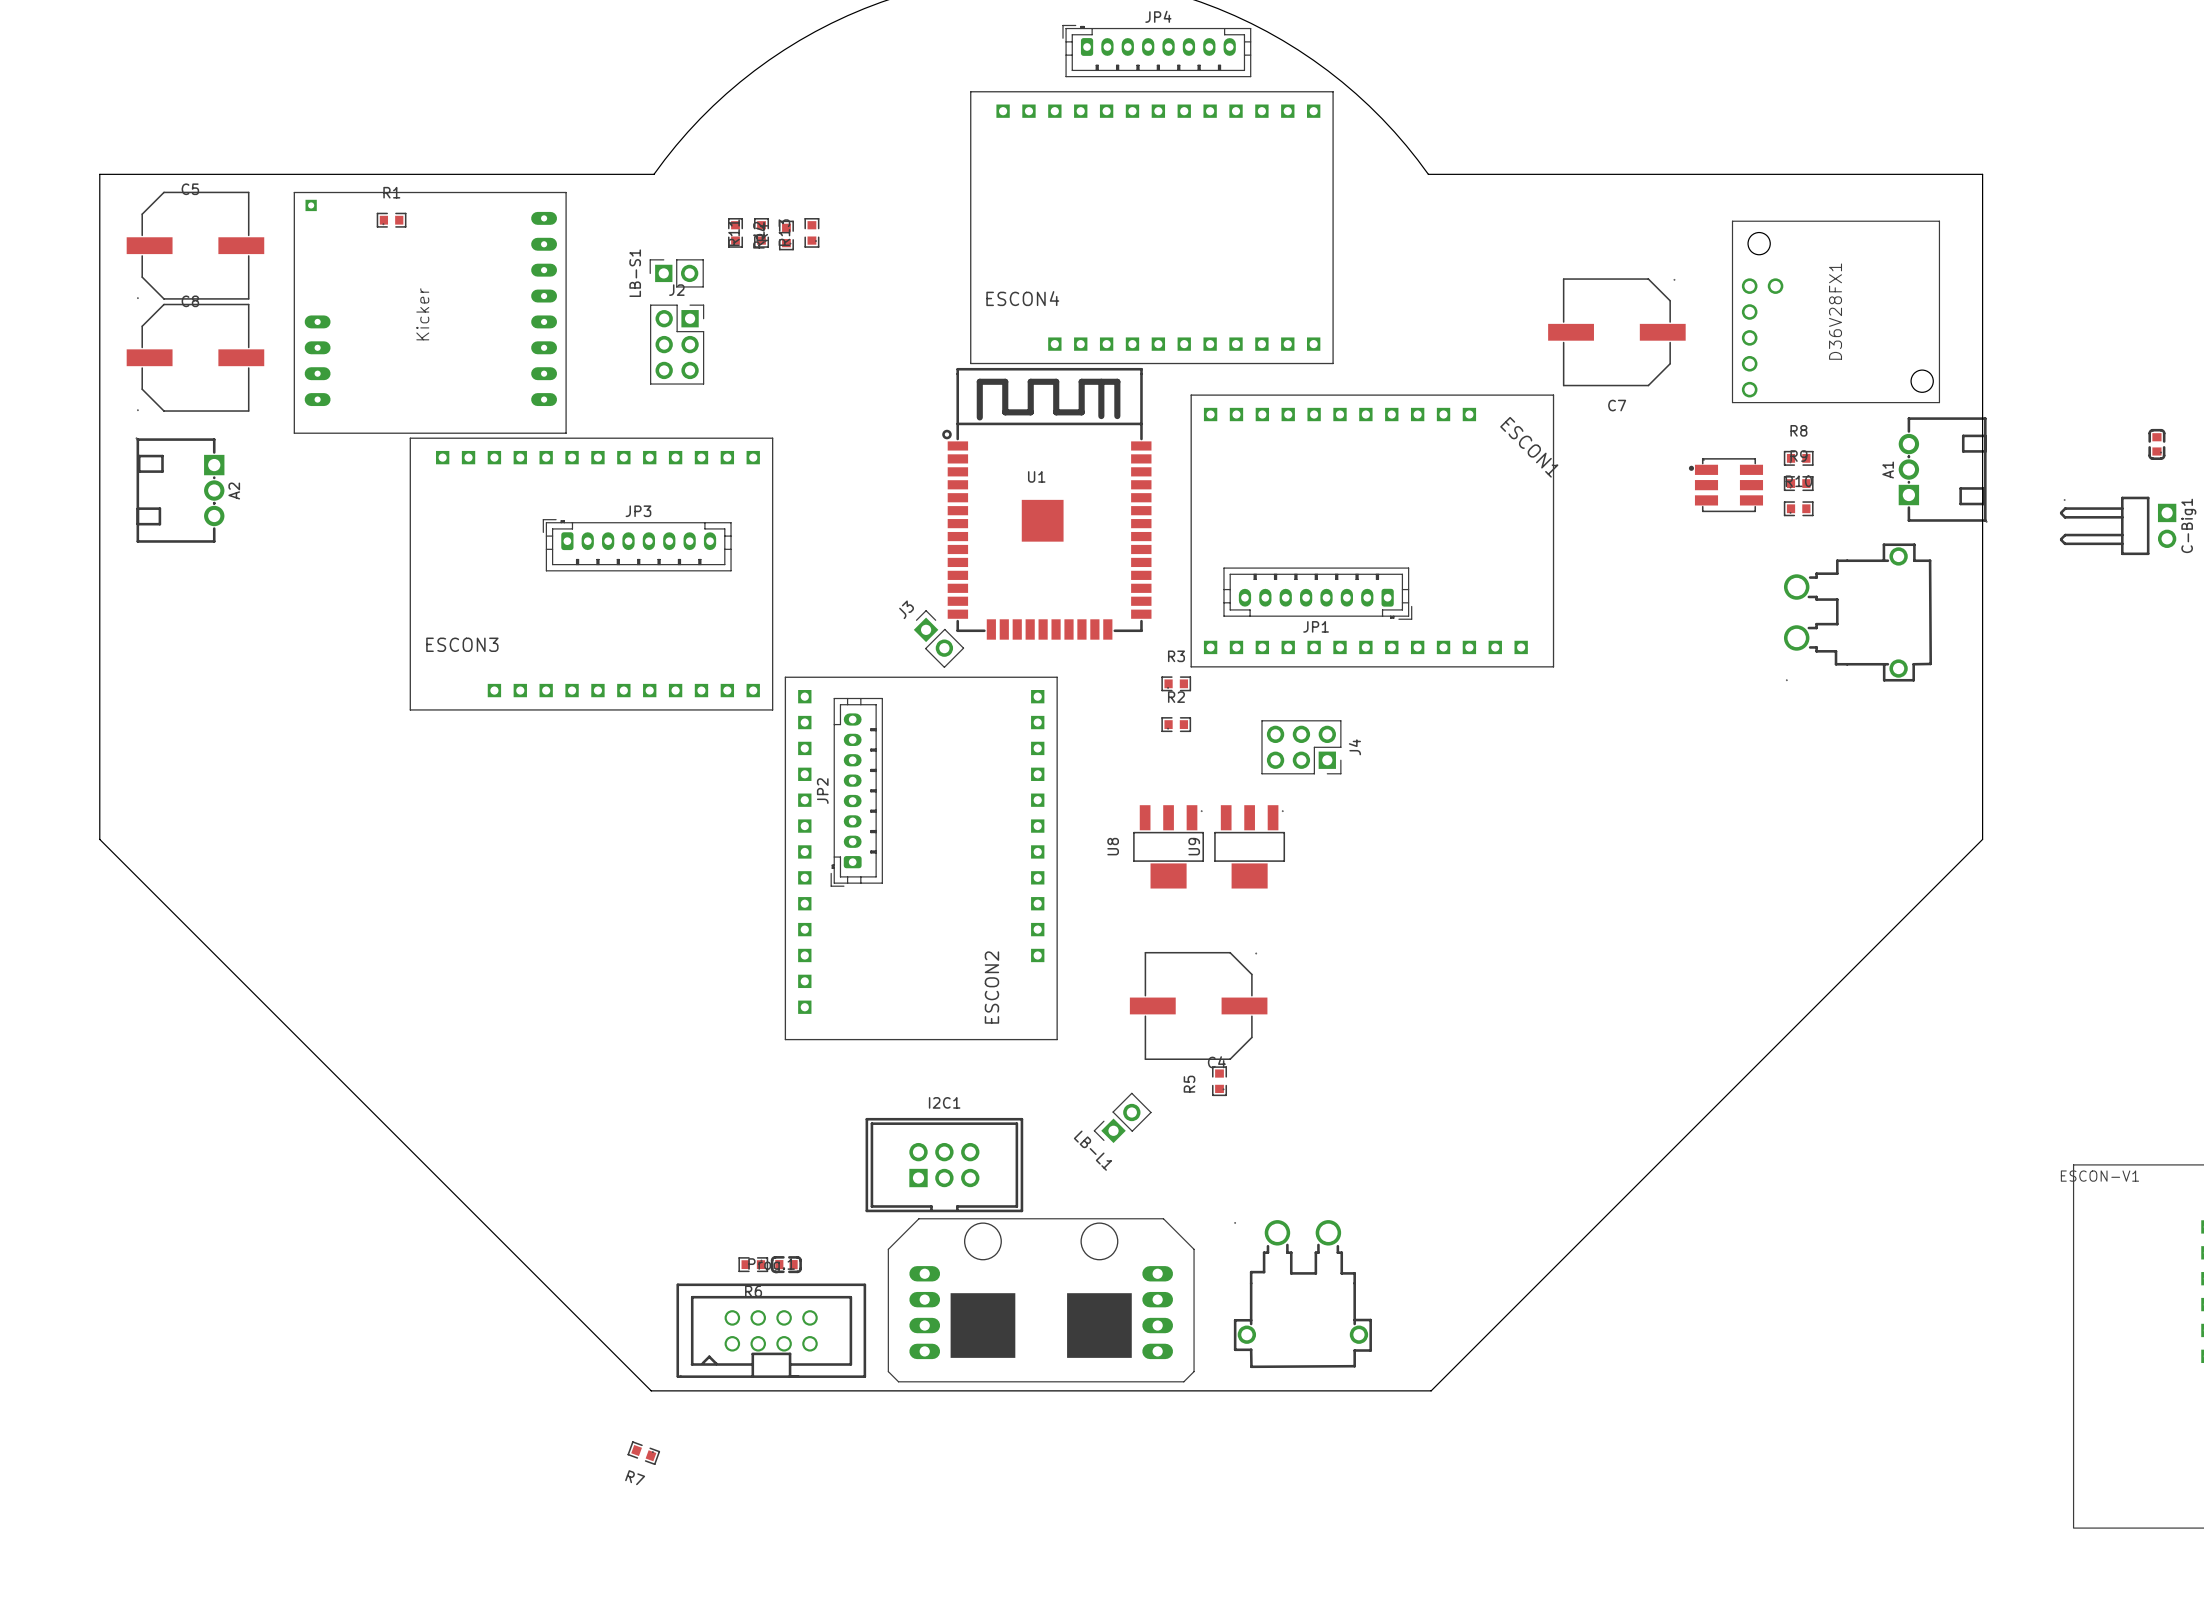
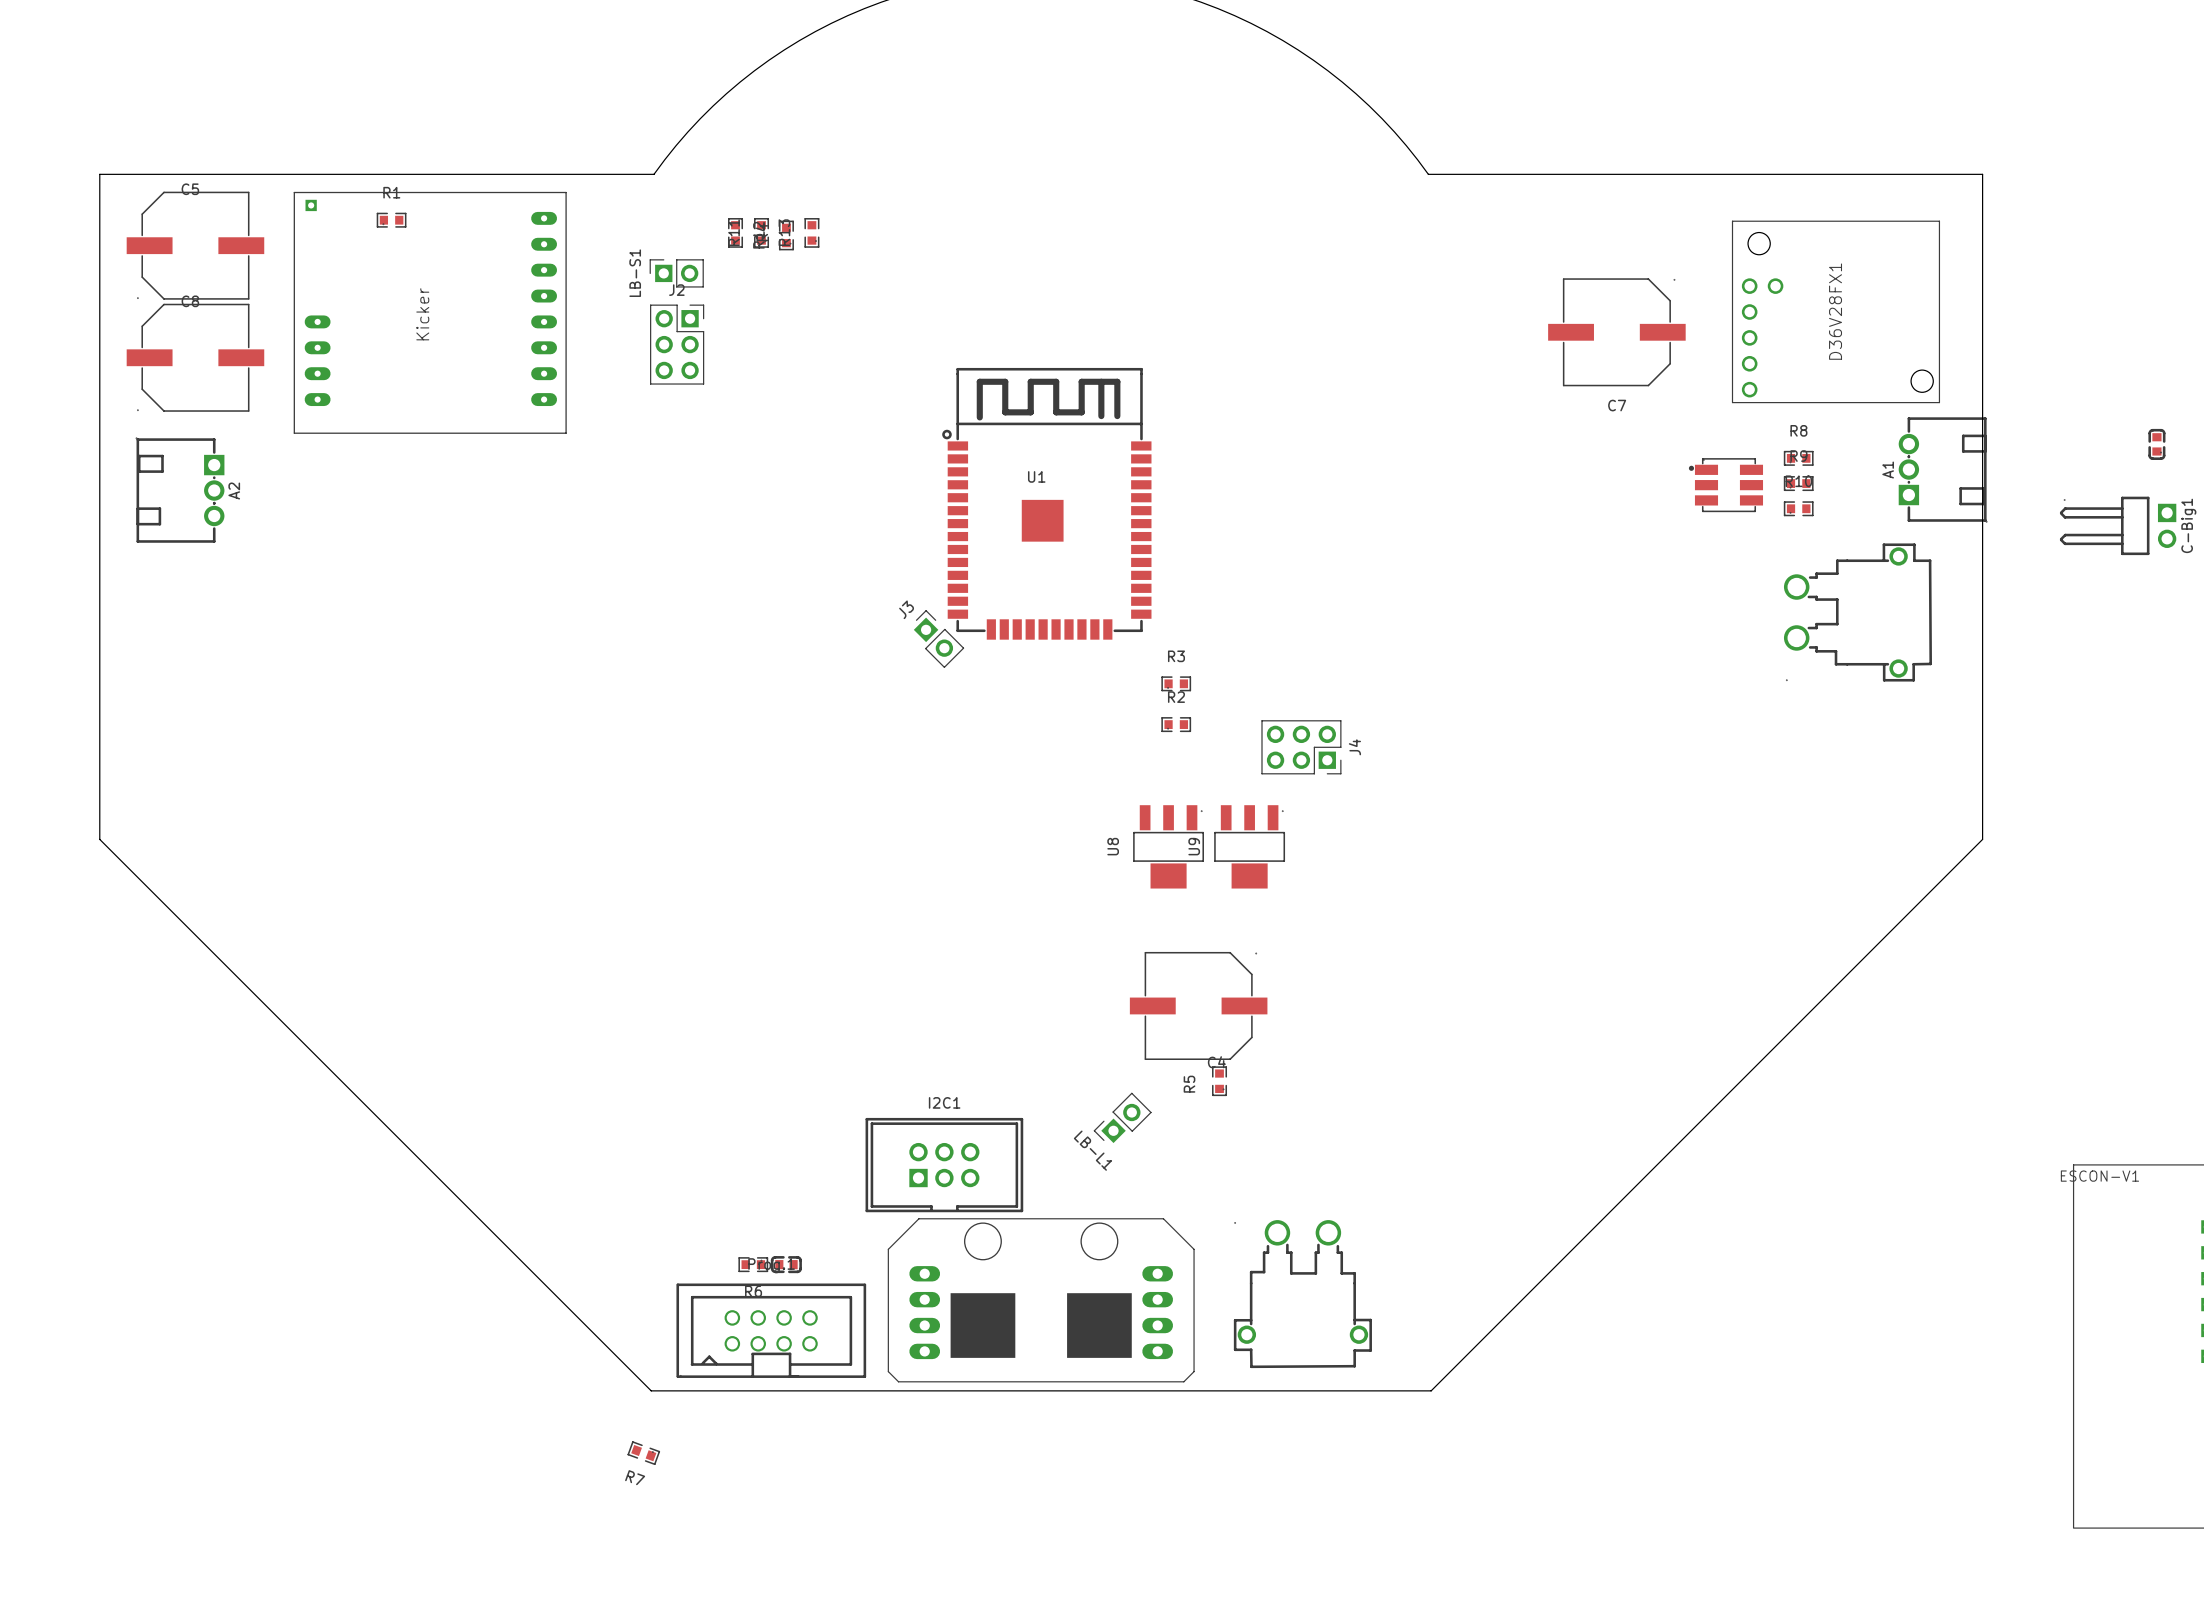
JP4: (1156, 51) -> none
ESCON4: (1151, 227) -> none
ESCON1: (1372, 530) -> none
JP3: (637, 545) -> none
ESCON3: (591, 574) -> none
JP1: (1317, 593) -> none
JP2: (856, 792) -> none
ESCON2: (921, 858) -> none

